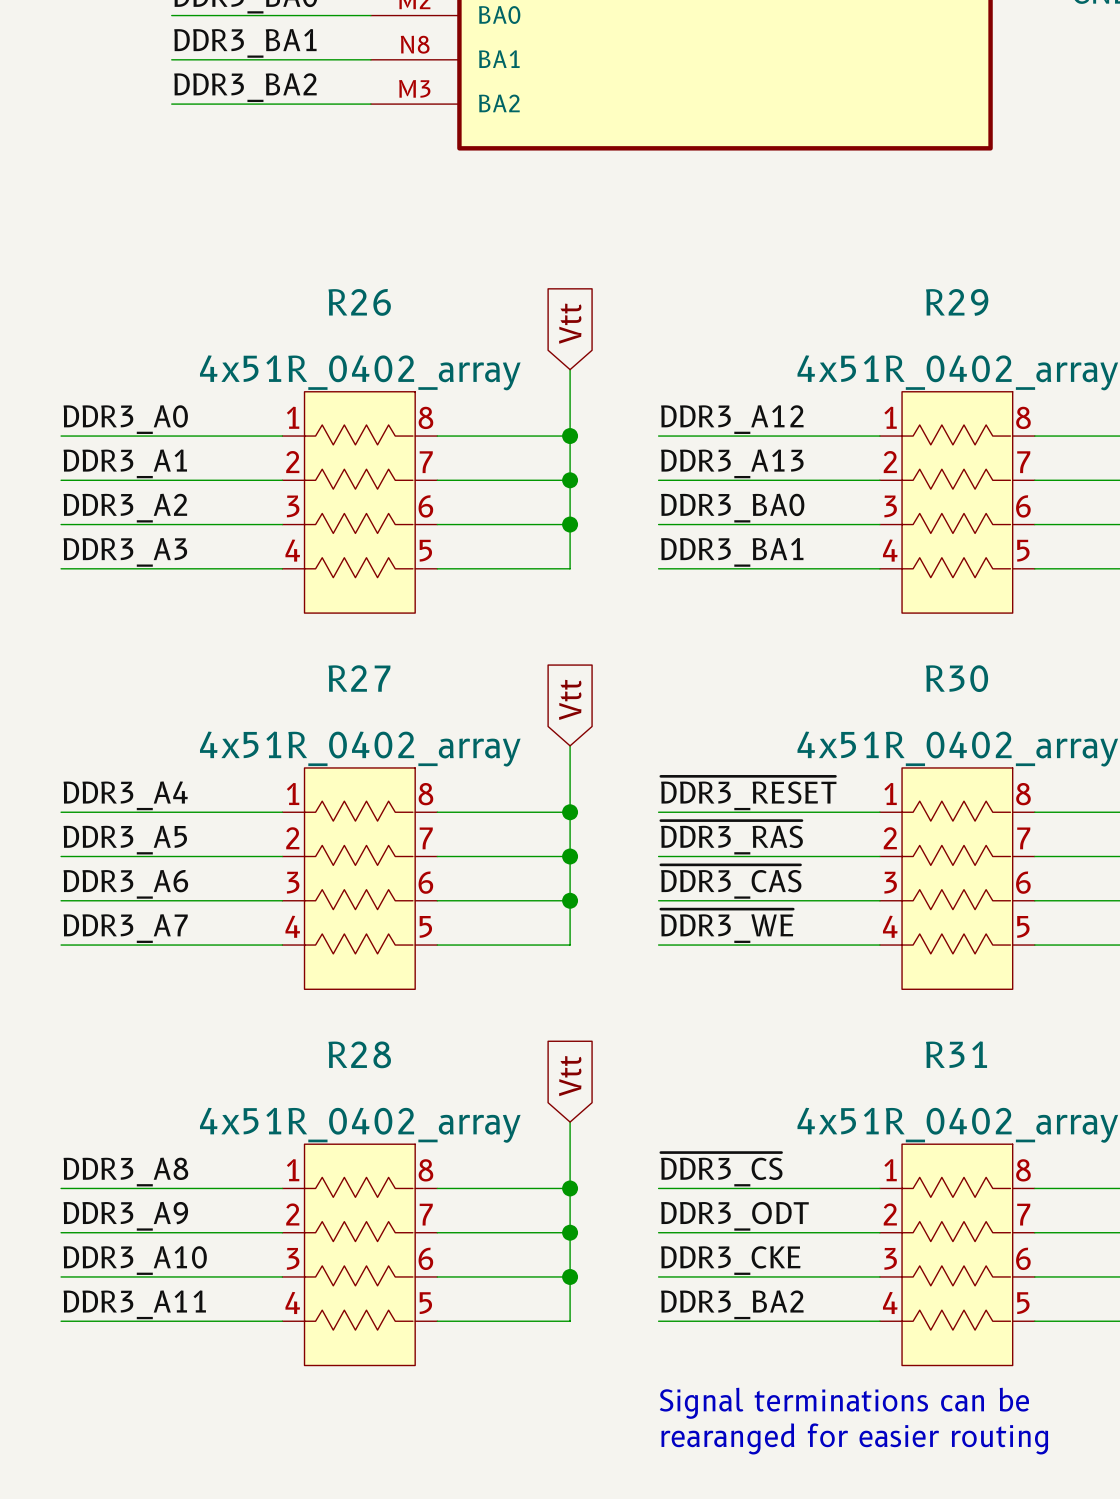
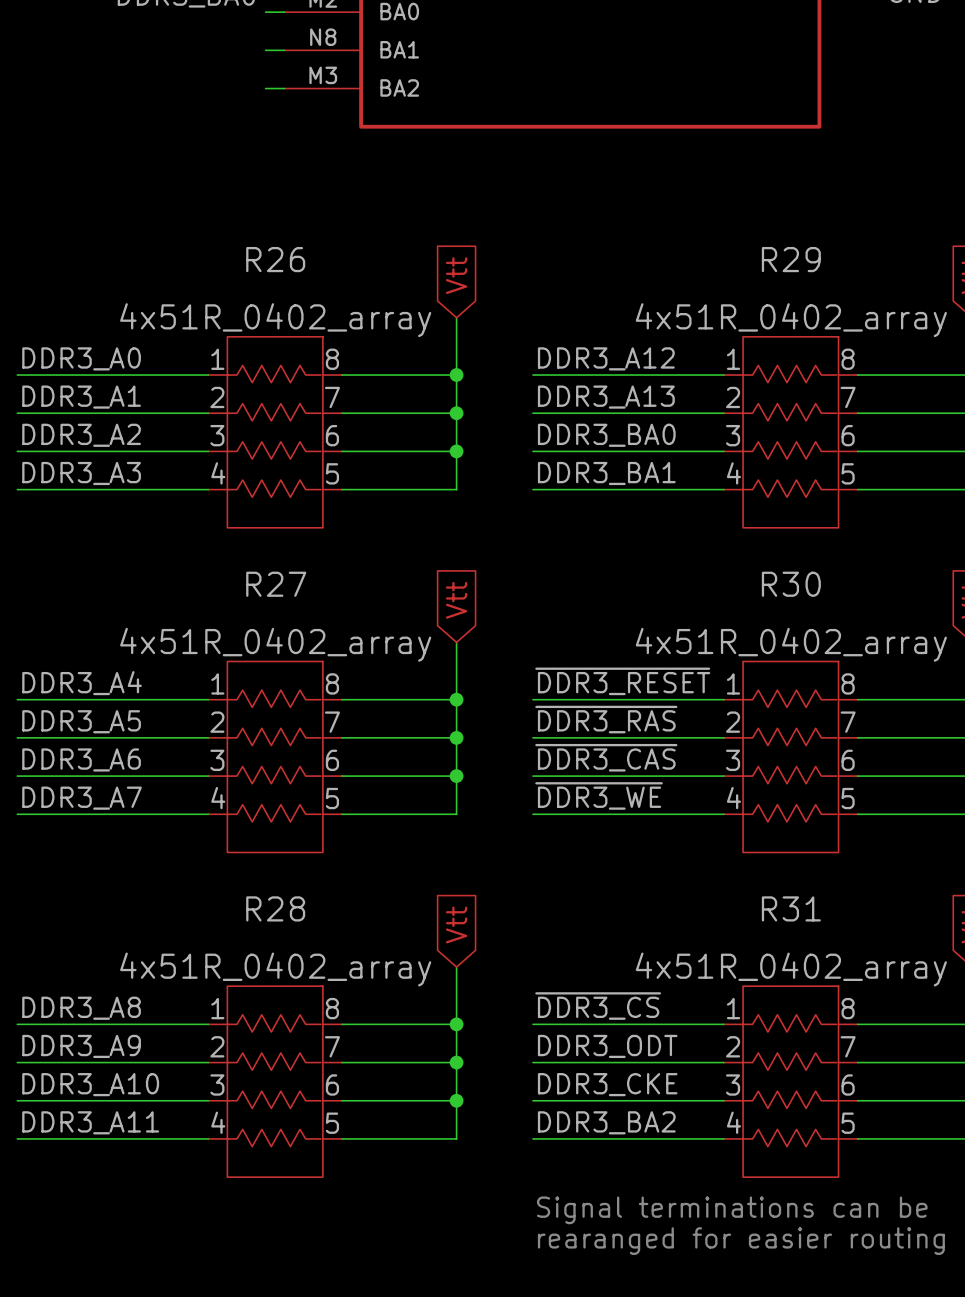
wire: (171, 15) (348, 15) -> none
label: DDR3_BA1 (245, 43) -> none
wire: (171, 59) (348, 59) -> none
label: DDR3_BA2 (245, 87) -> none
wire: (171, 104) (348, 104) -> none

